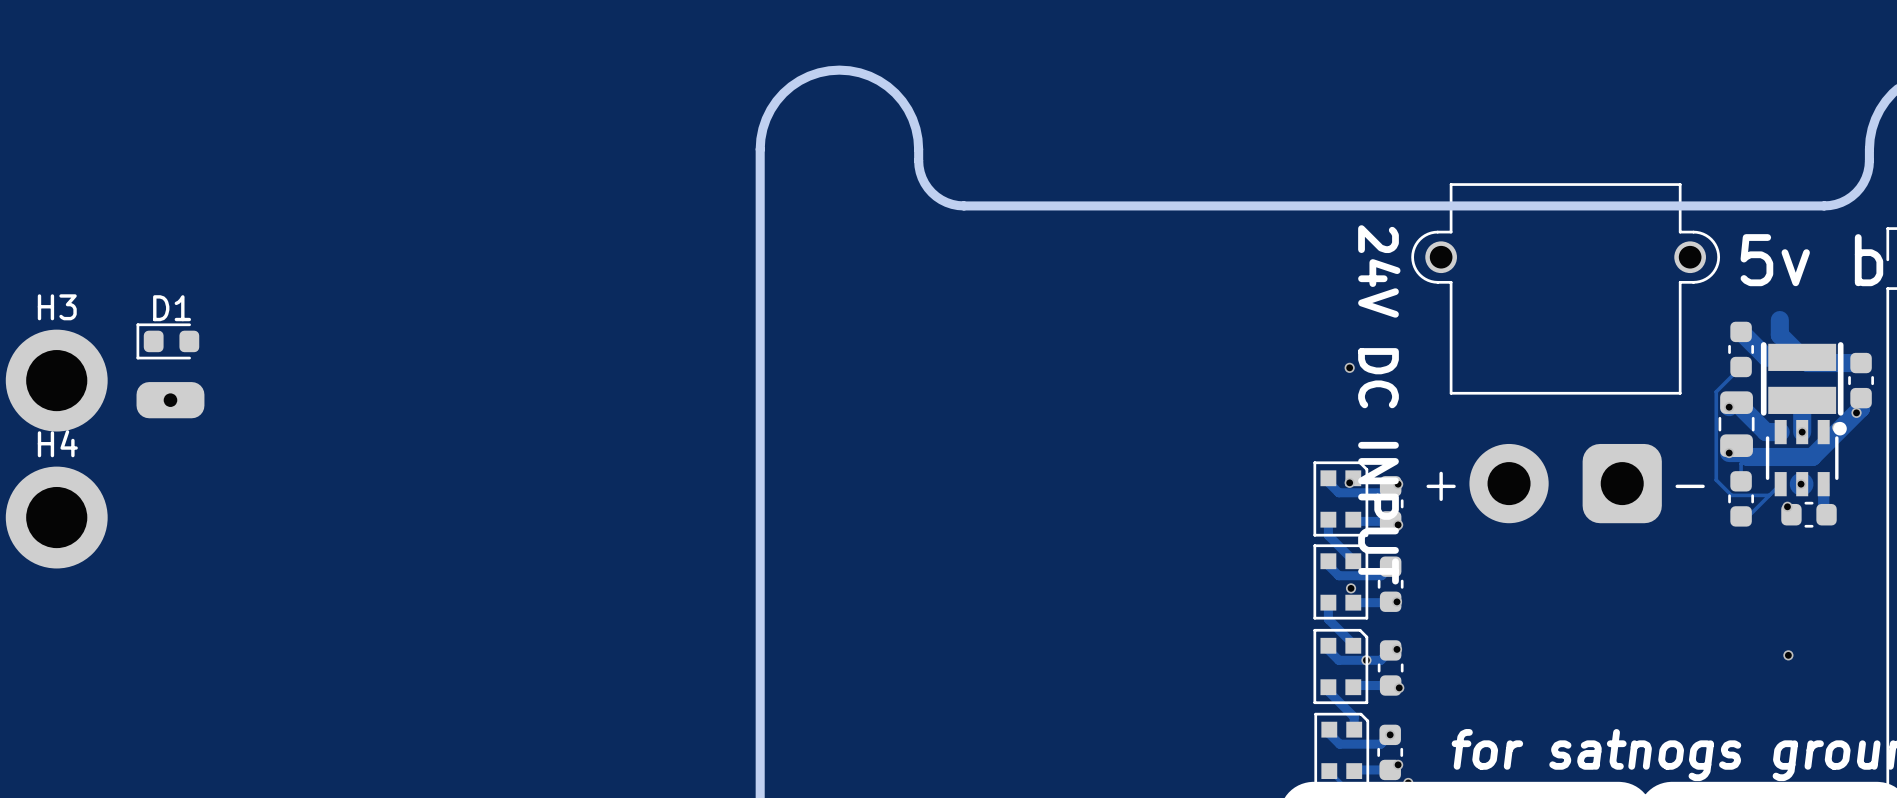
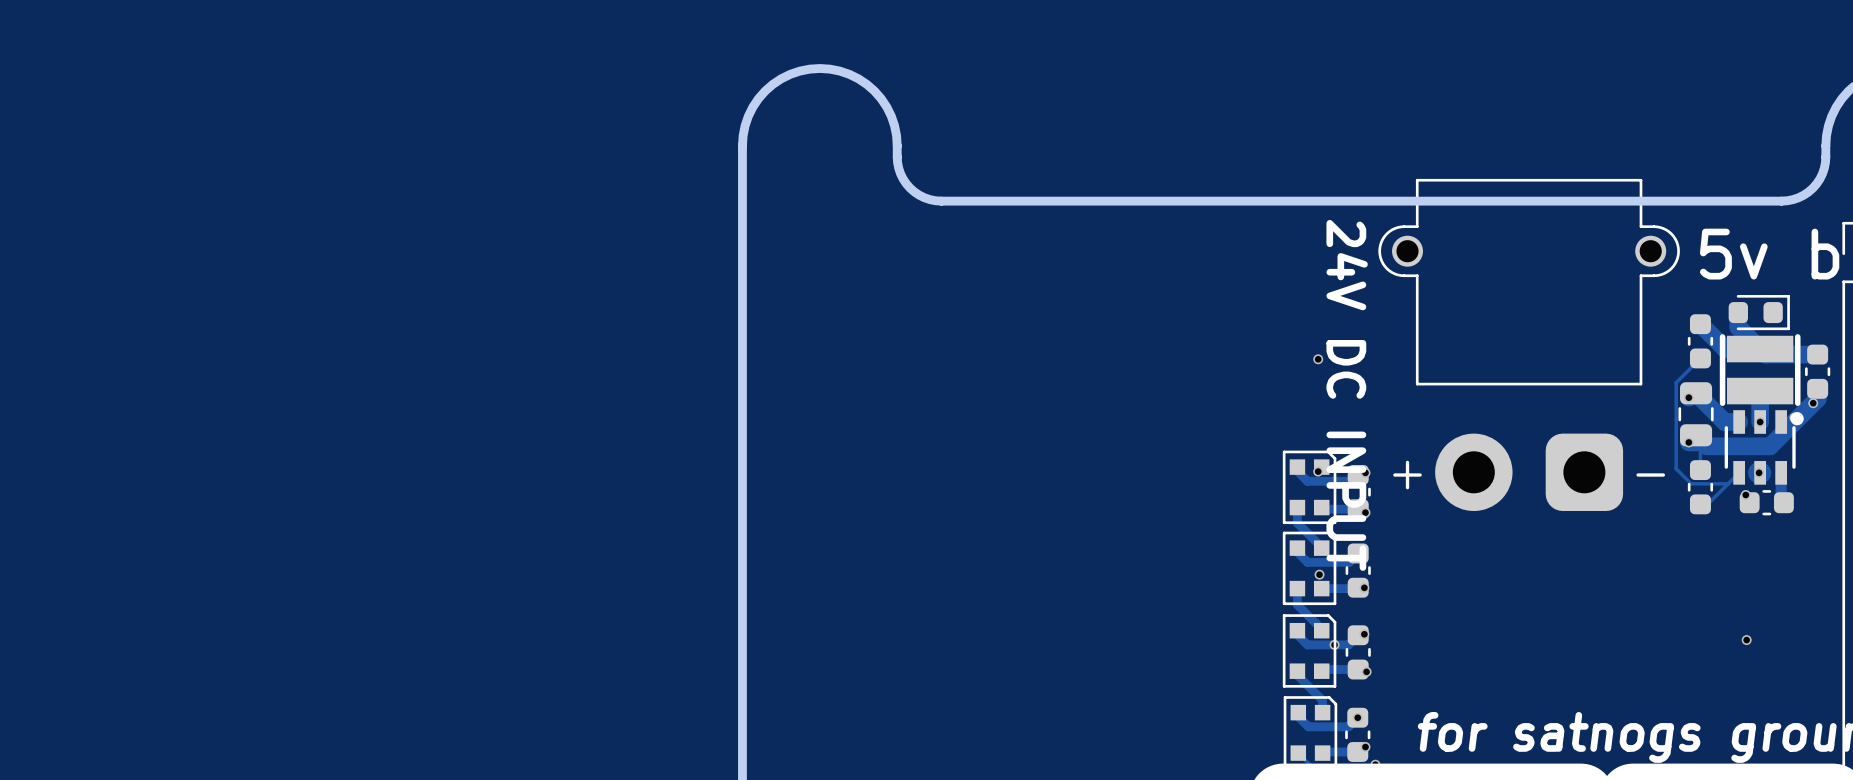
part: none -> (1759, 312)
D1: (167, 341) -> none
H3: (56, 380) -> none
part: (170, 400) -> none
H4: (56, 517) -> none

